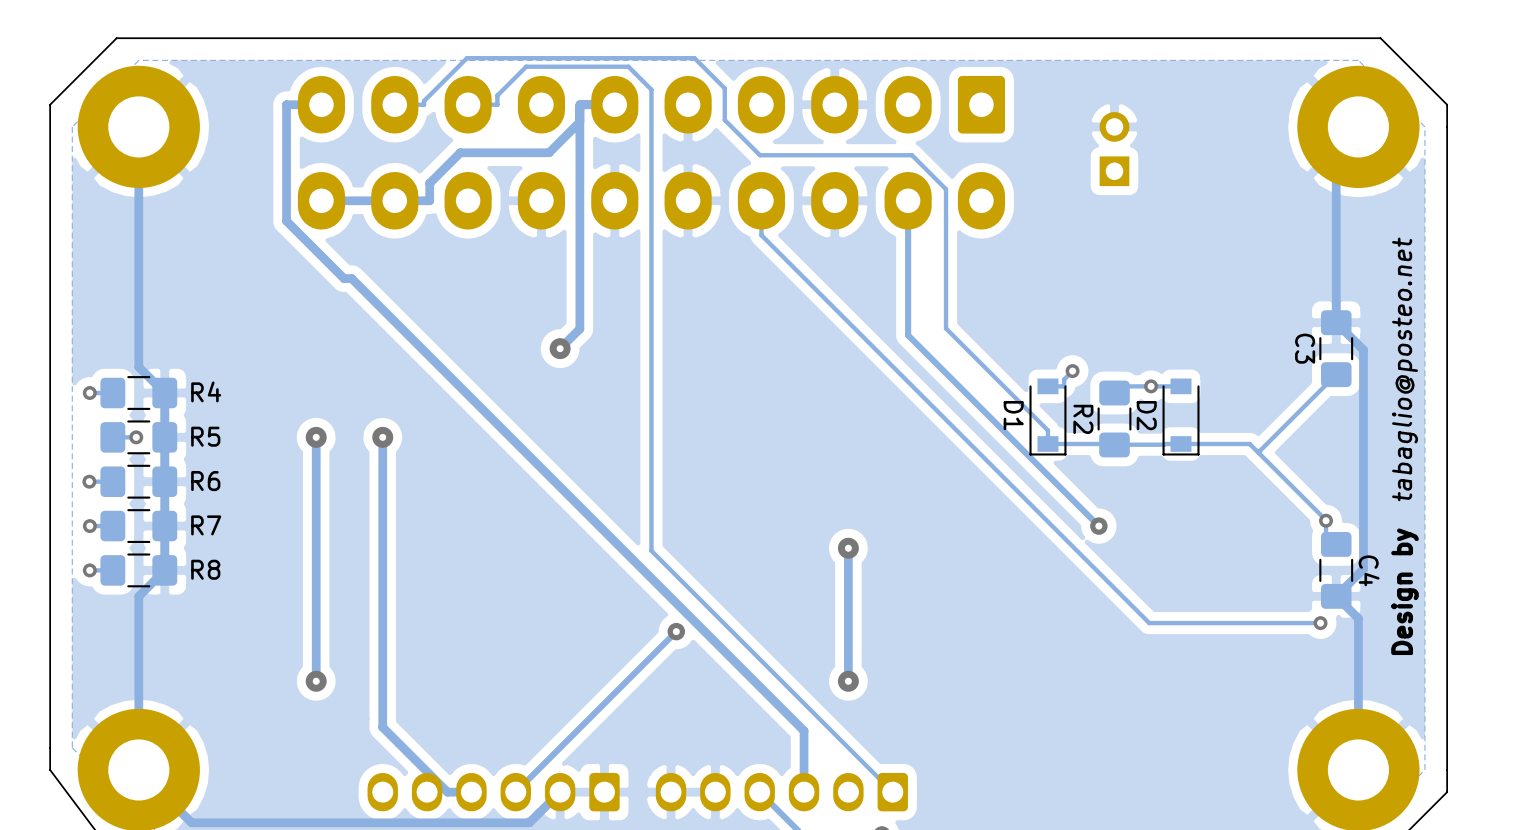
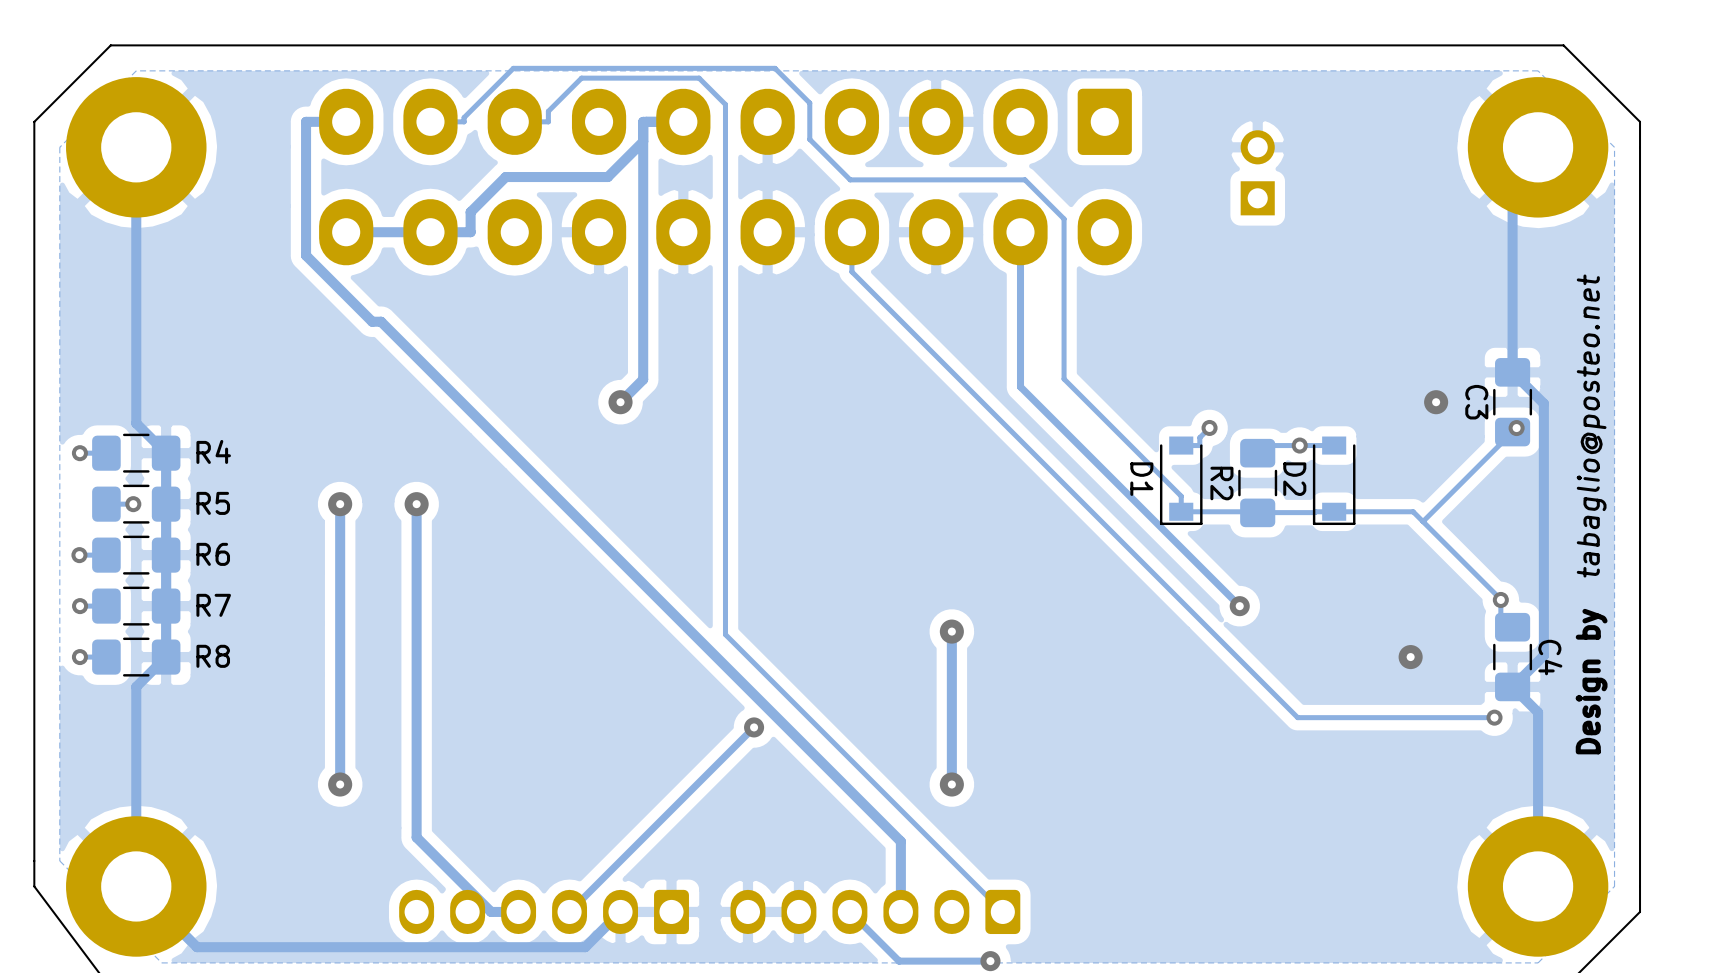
via: none -> (1436, 402)
via: none -> (1516, 428)
via: none -> (1410, 657)

